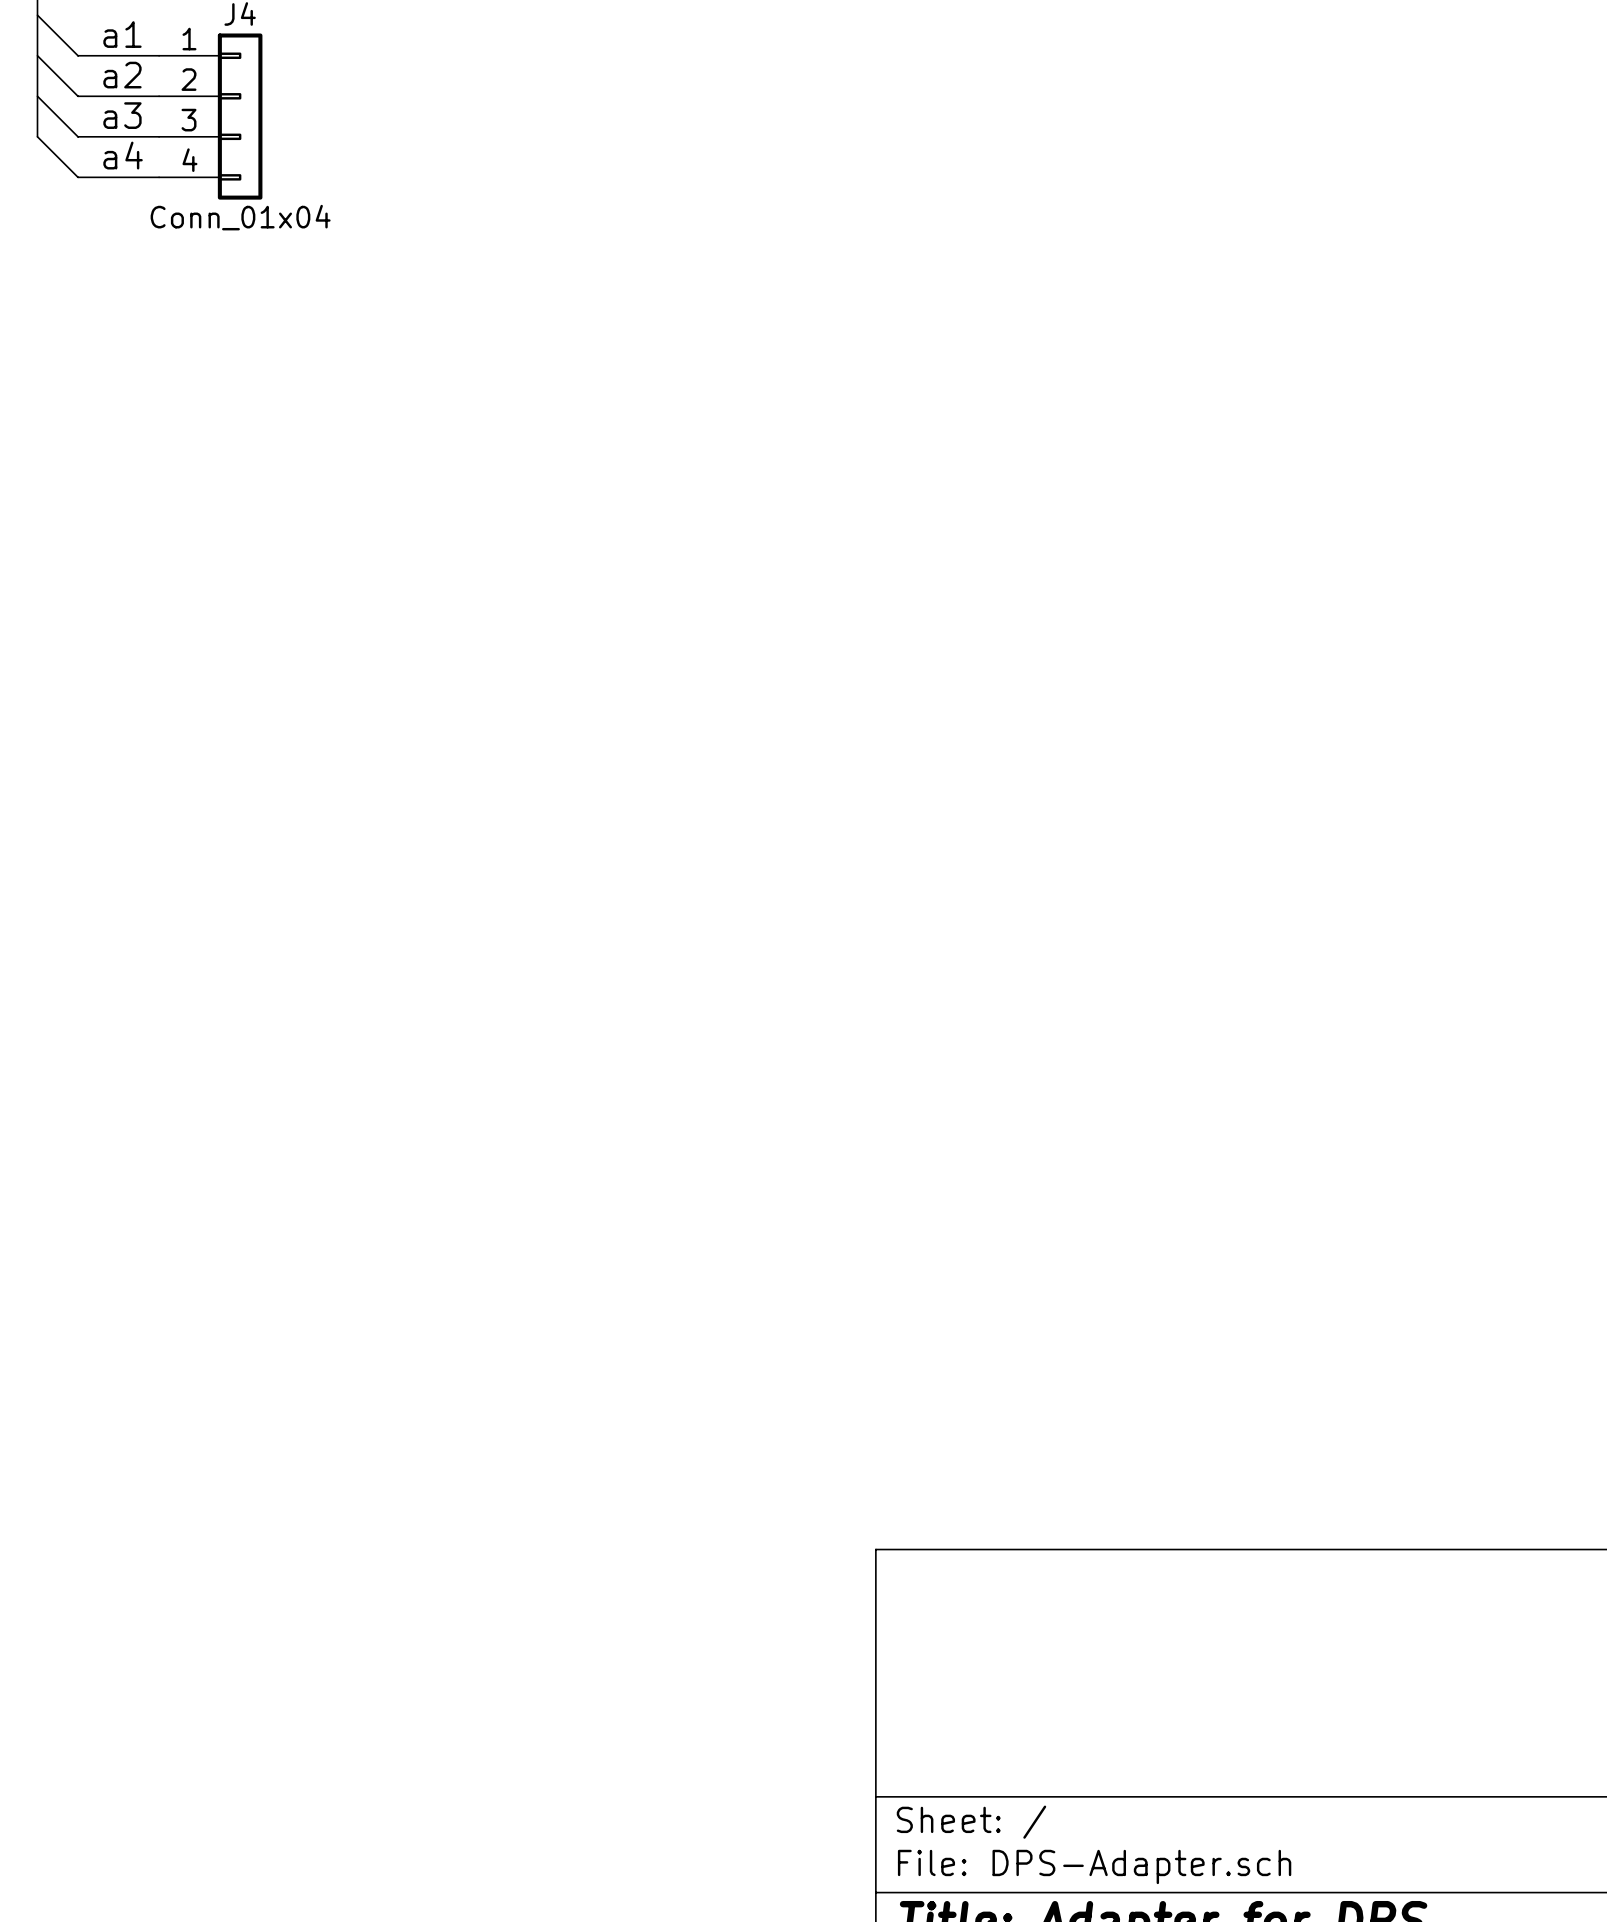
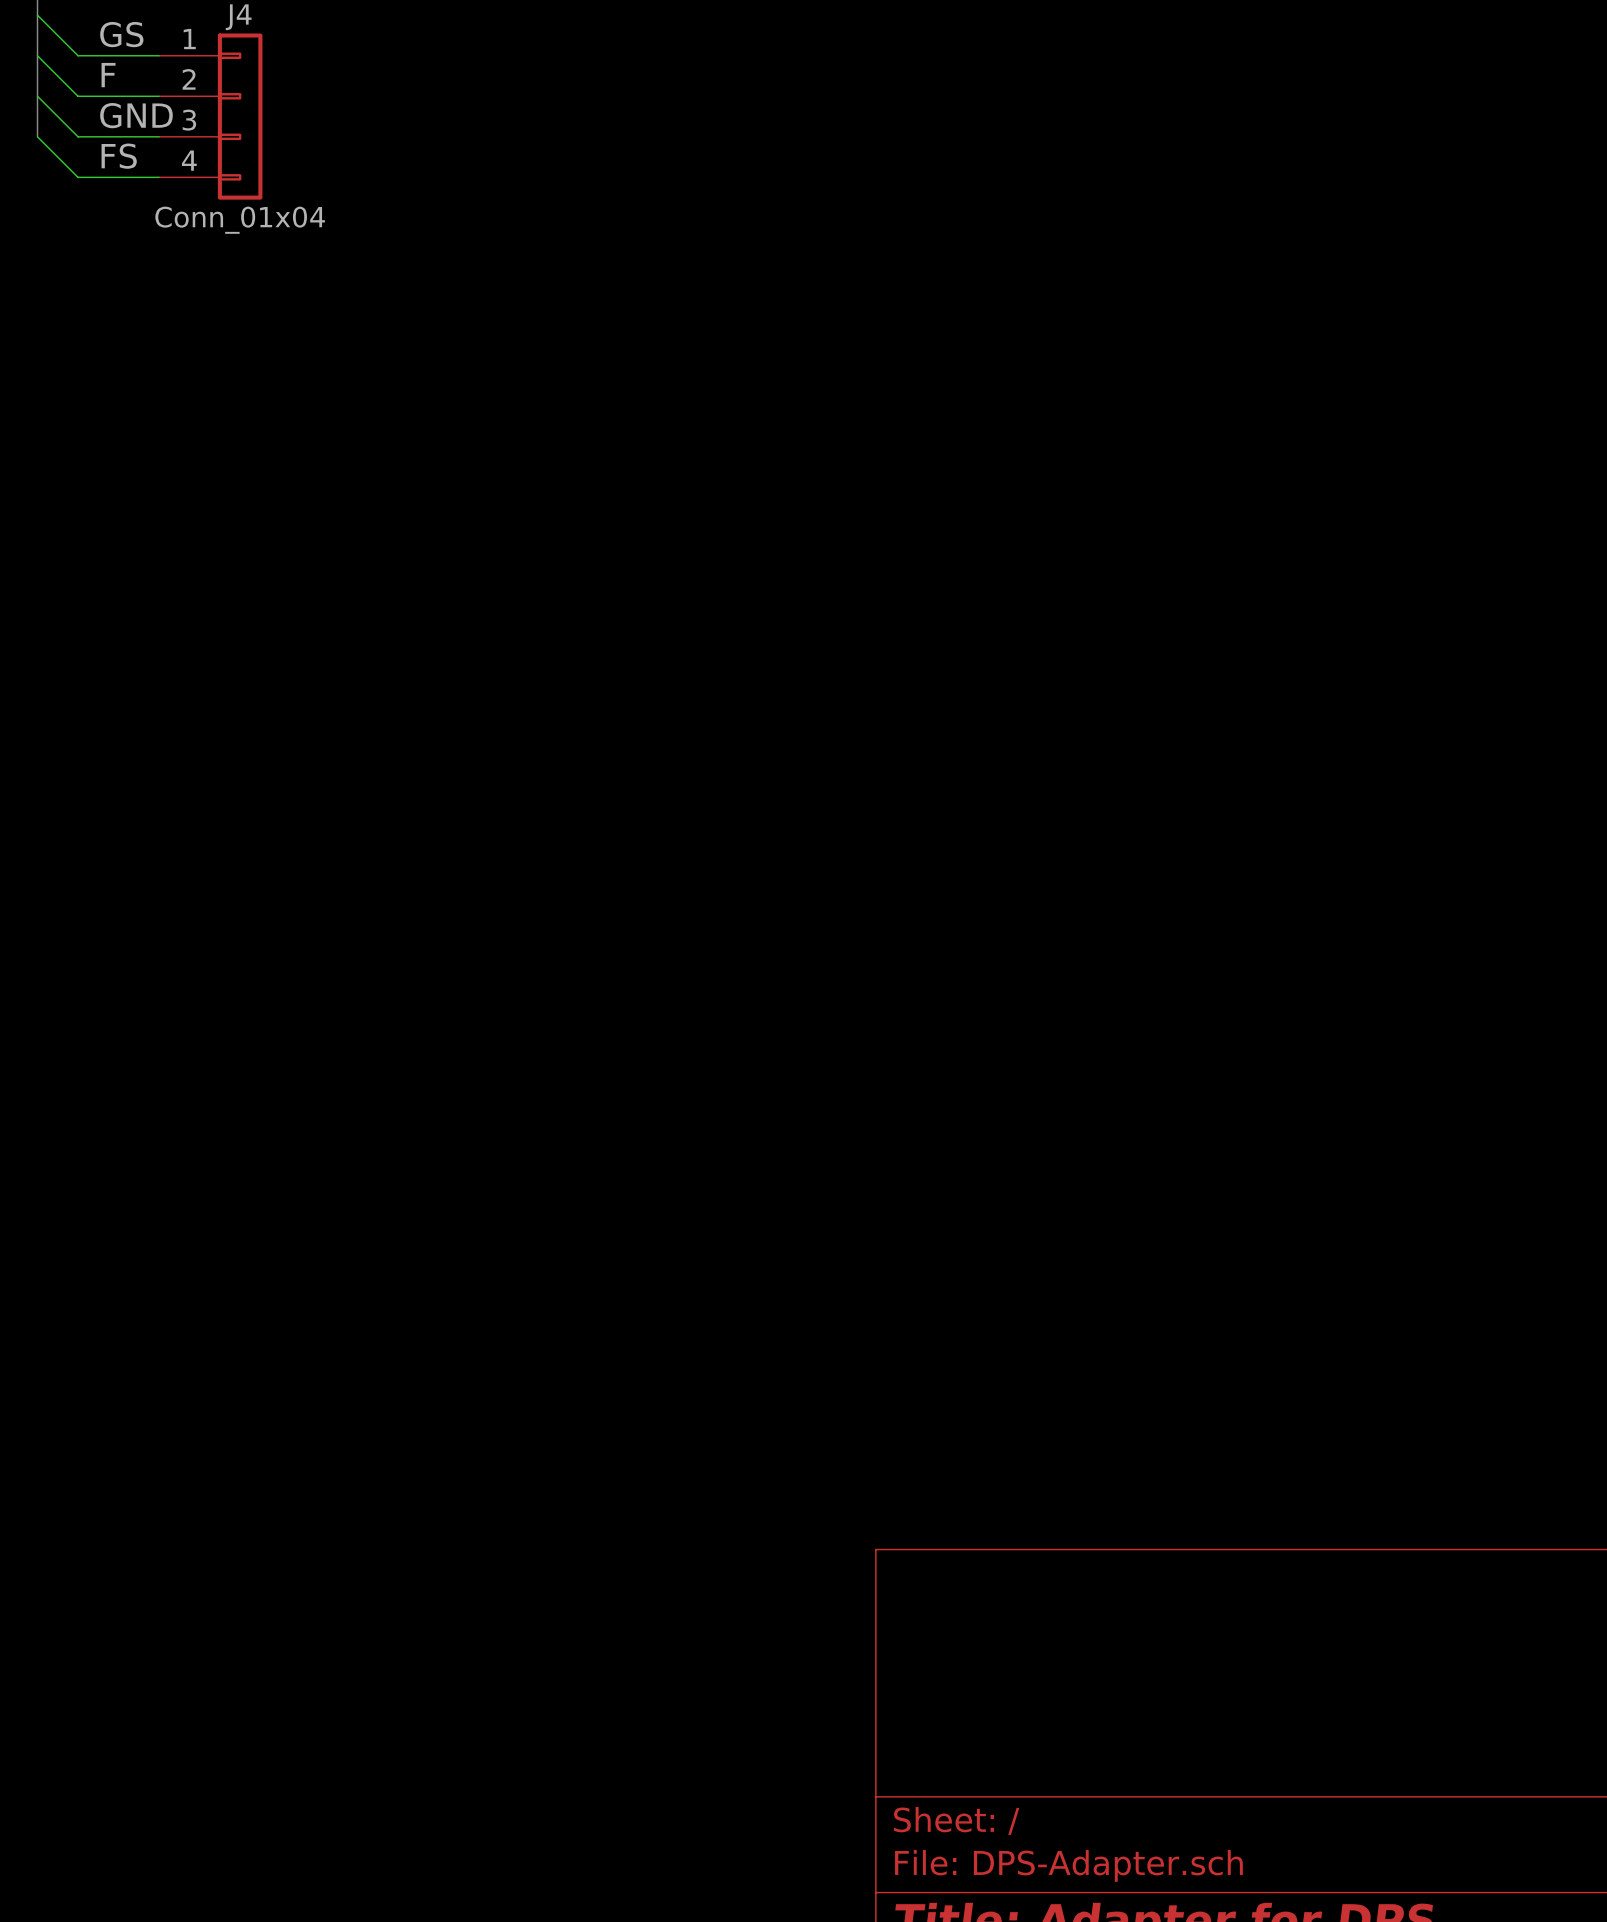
label: a1 (122, 34) -> GS (121, 34)
label: a2 (122, 75) -> F (108, 75)
label: a3 (122, 115) -> GND (136, 115)
label: a4 (123, 155) -> FS (119, 156)

